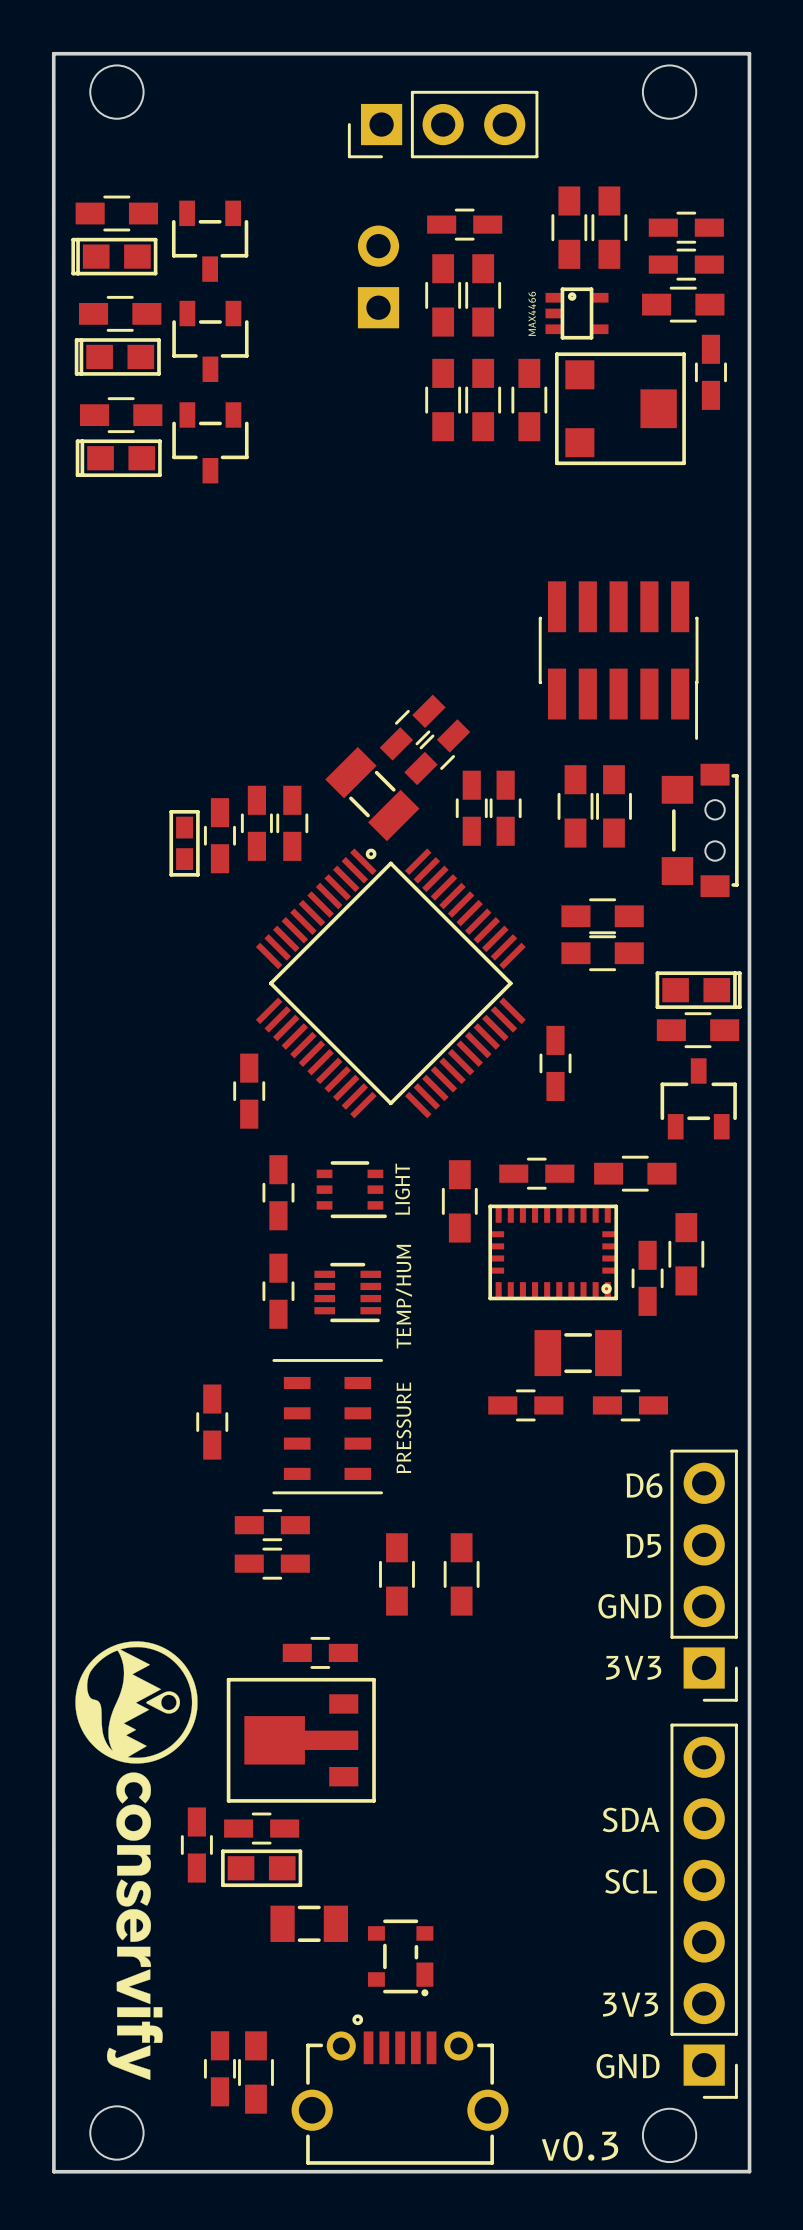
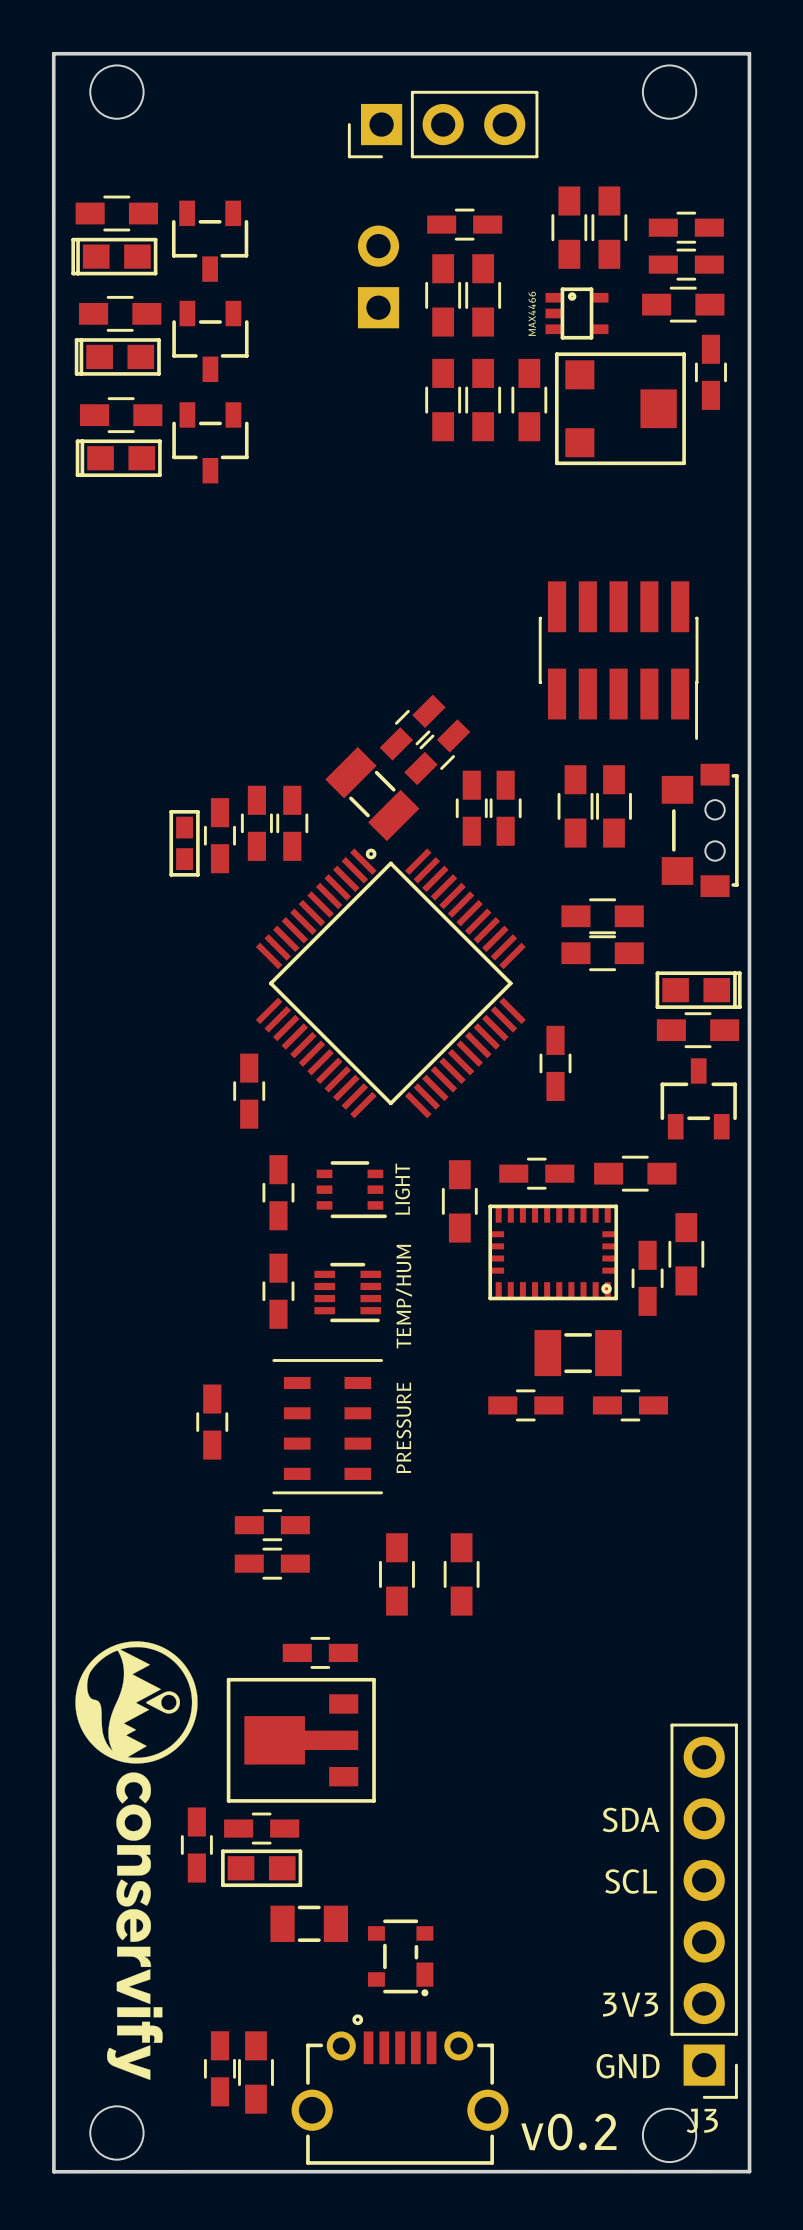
text: D6 (644, 1485) -> none
text: D5 (643, 1545) -> none
part: (704, 1575) -> none
text: GND (629, 1606) -> none
text: 3V3 (633, 1667) -> none
J3 name: none -> J3 (702, 2120)
text: v0.3 (580, 2146) -> v0.2 (568, 2132)

